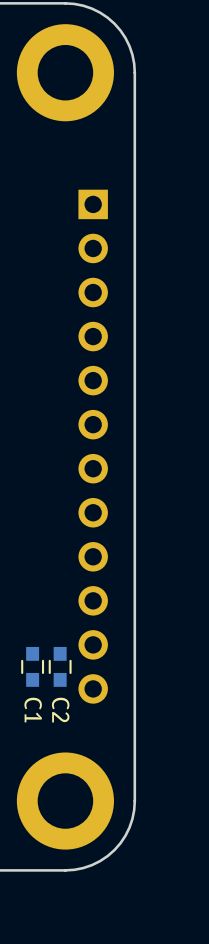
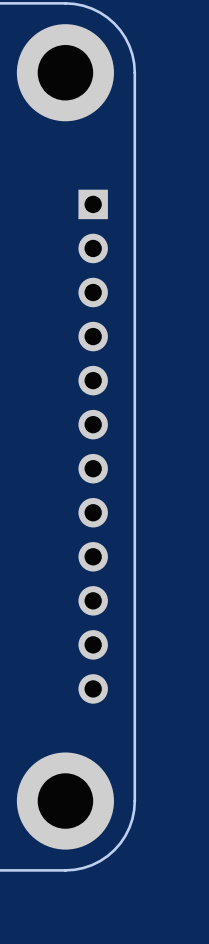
C1: (32, 666) -> none
C2: (60, 666) -> none

